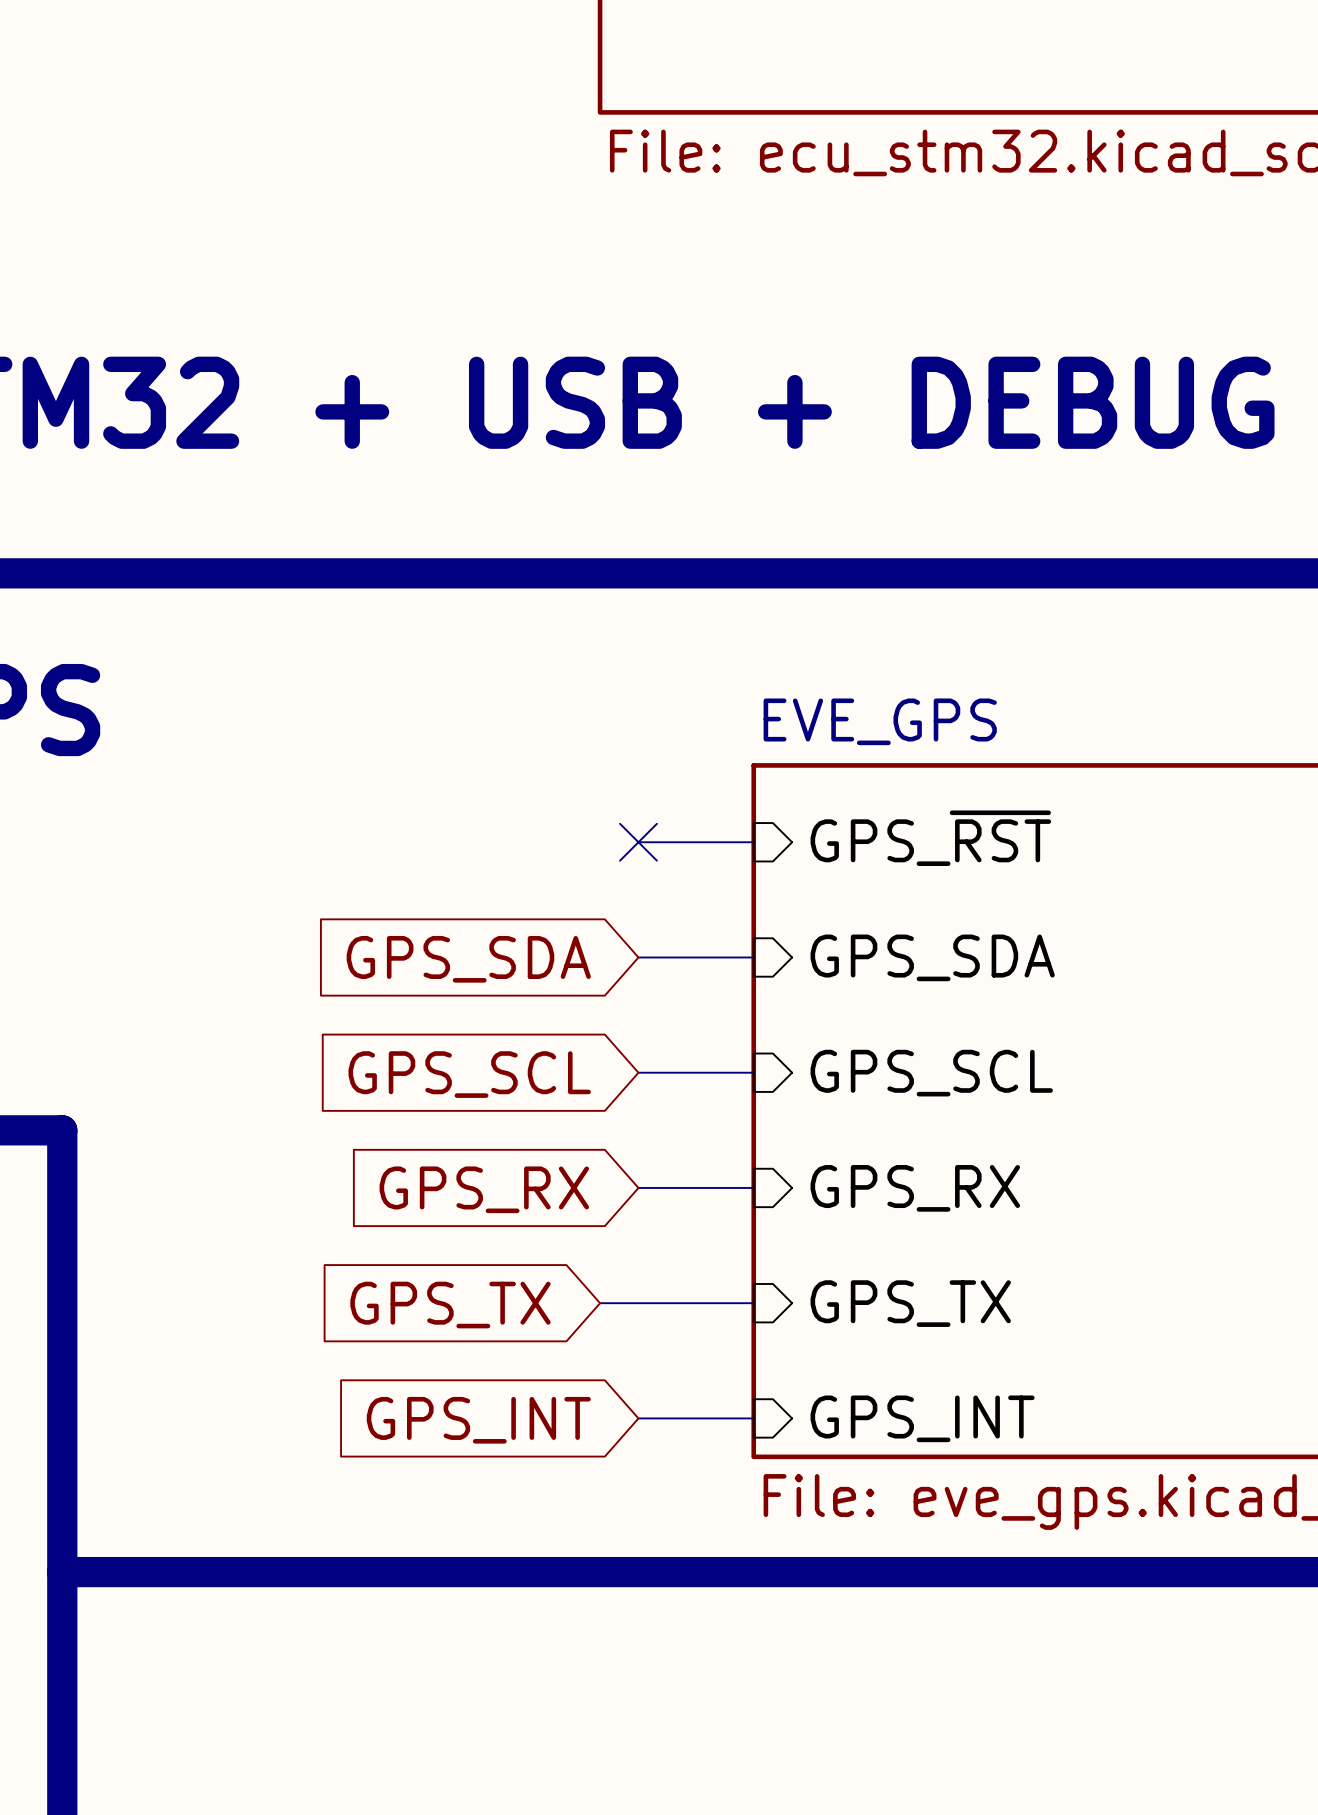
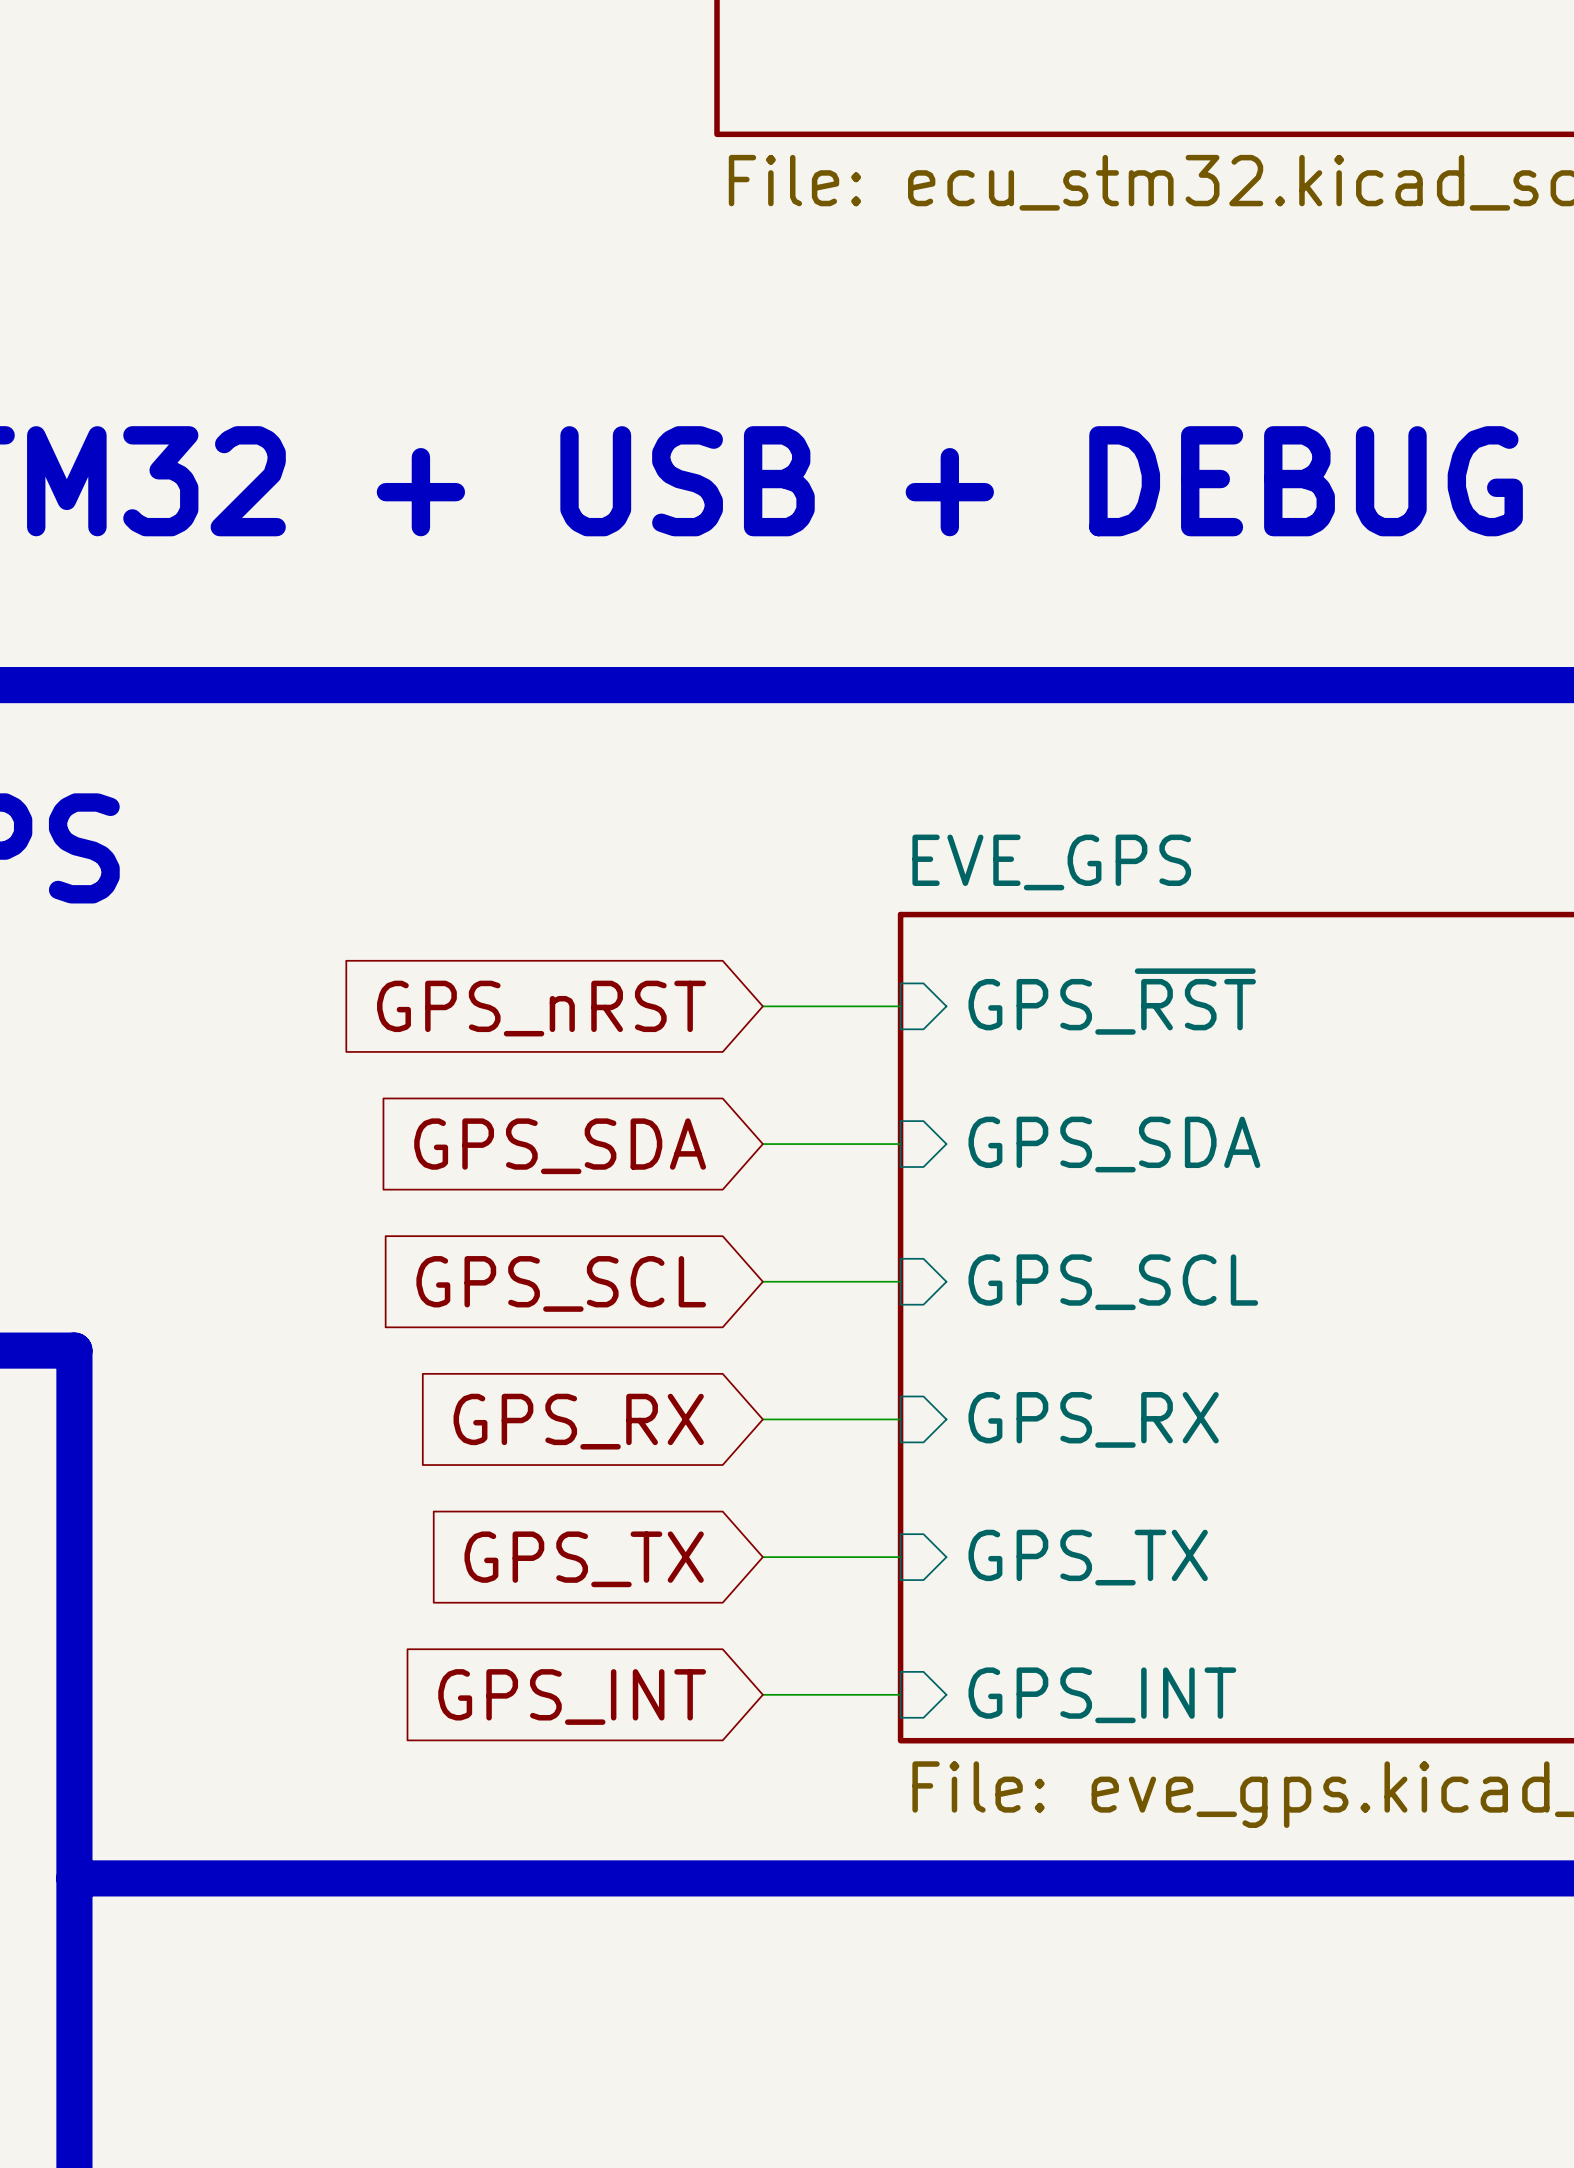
no-connect mark: (638, 842) -> none
global label: none -> GPS_nRST (541, 1008)
wire: (600, 1303) (638, 1303) -> none
global label position: GPS_TX (450, 1305) -> GPS_TX (584, 1559)

